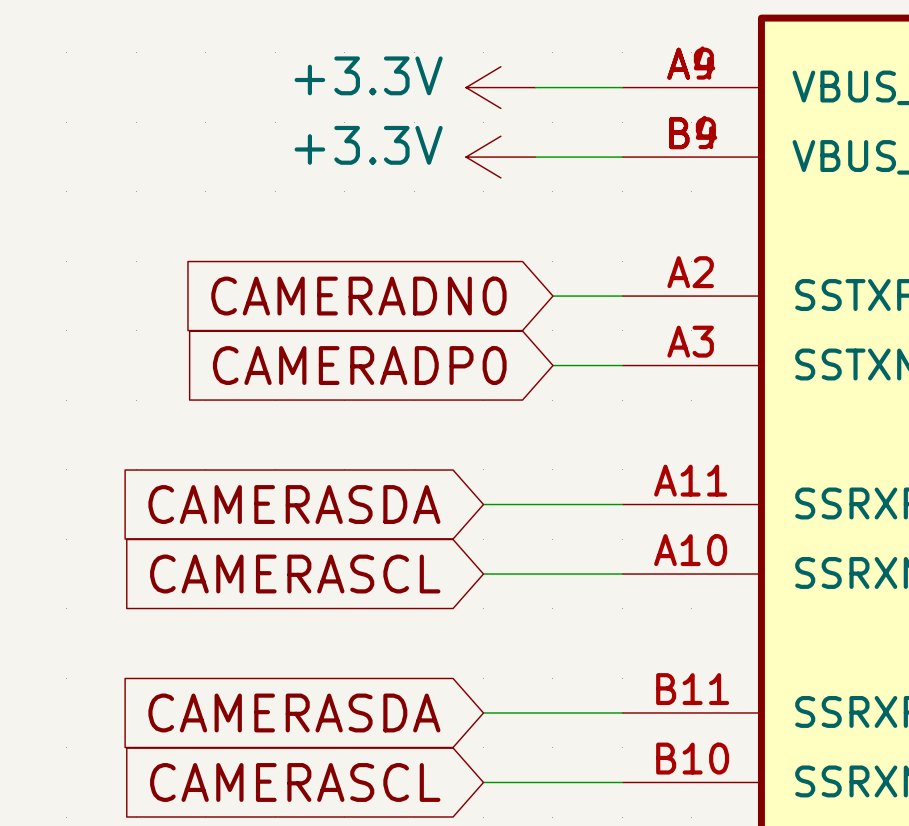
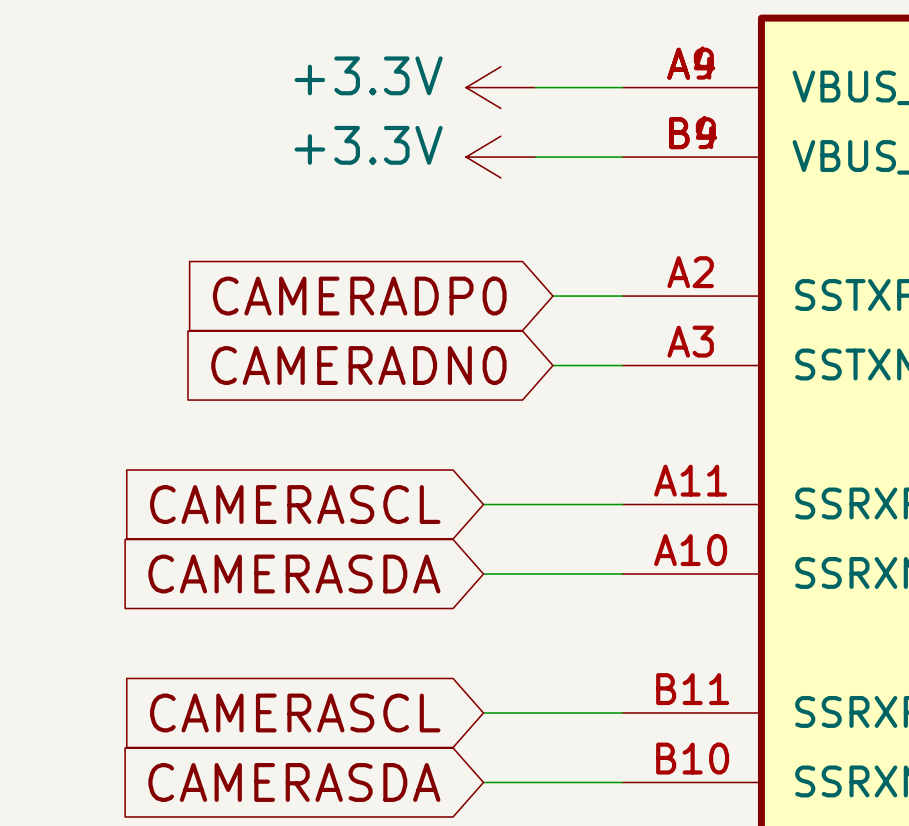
global label: CAMERADN0 (358, 296) -> CAMERADP0 (359, 296)
global label: CAMERADP0 (359, 365) -> CAMERADN0 (358, 365)
global label: CAMERASDA (294, 504) -> CAMERASCL (295, 504)
global label: CAMERASCL (295, 574) -> CAMERASDA (294, 574)
global label: CAMERASDA (294, 712) -> CAMERASCL (295, 712)
global label: CAMERASCL (295, 782) -> CAMERASDA (294, 782)

